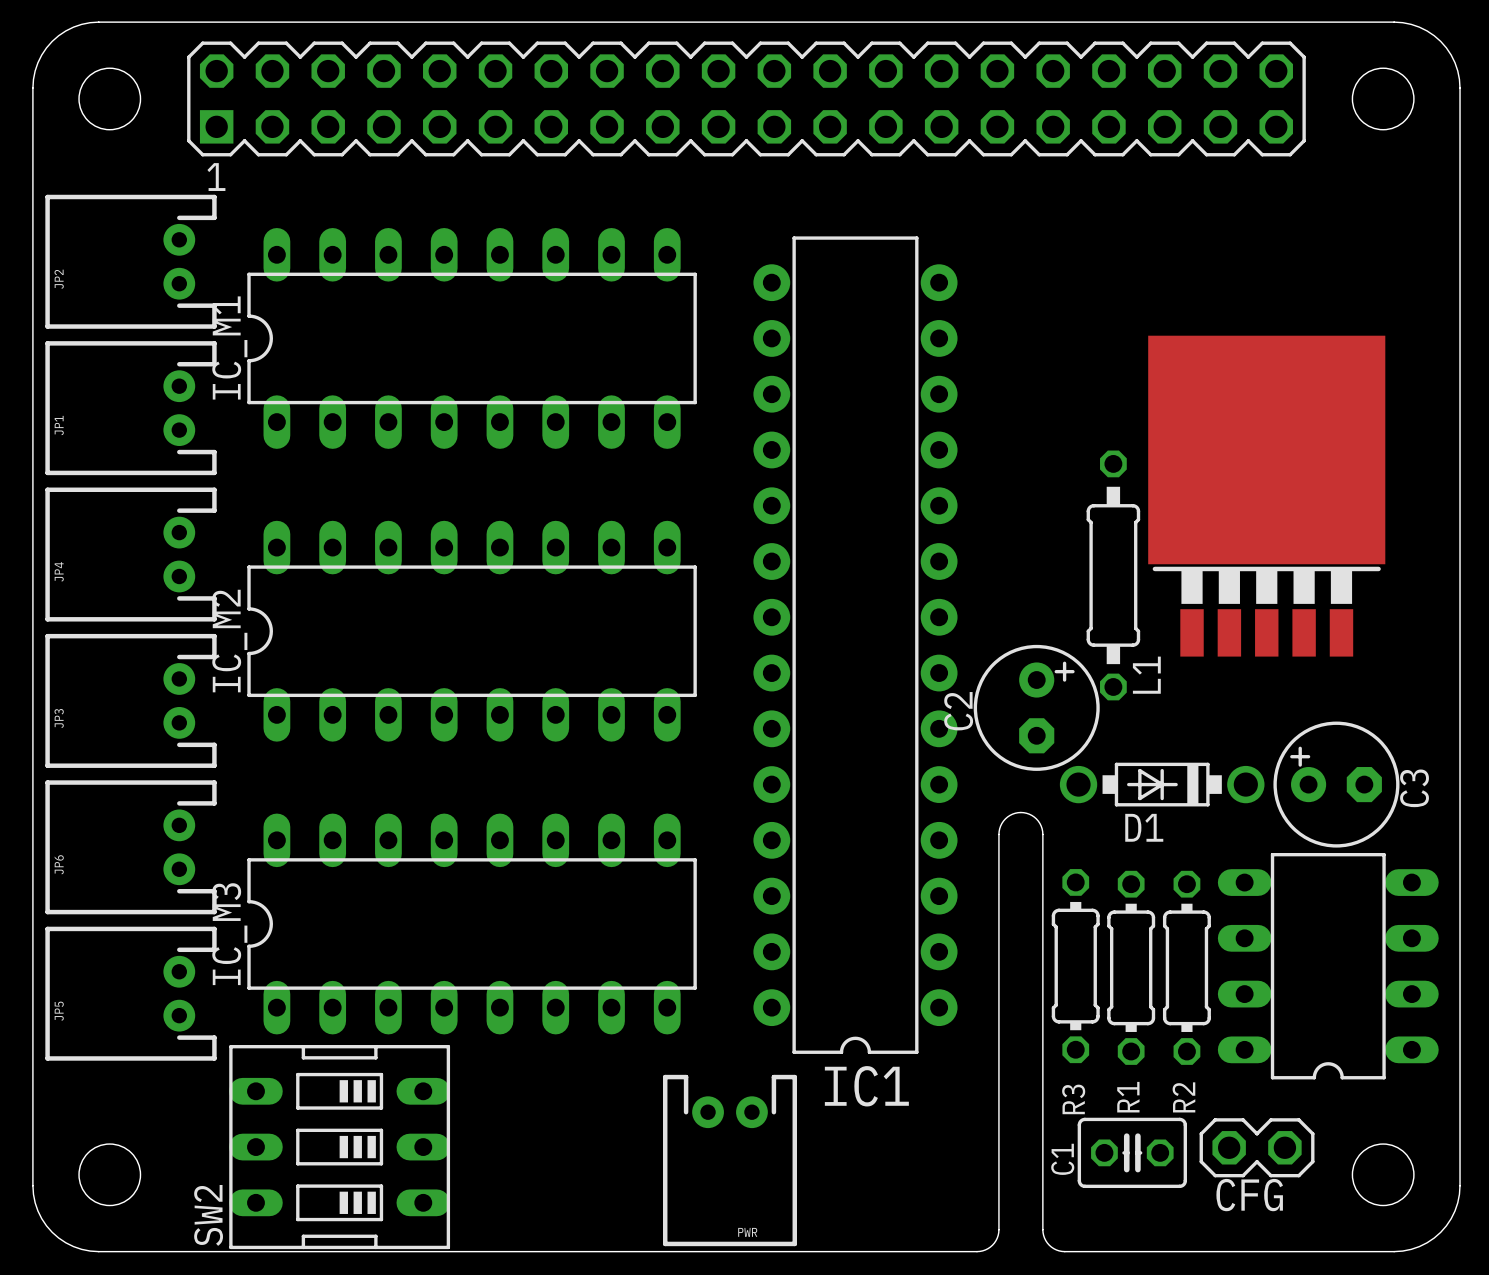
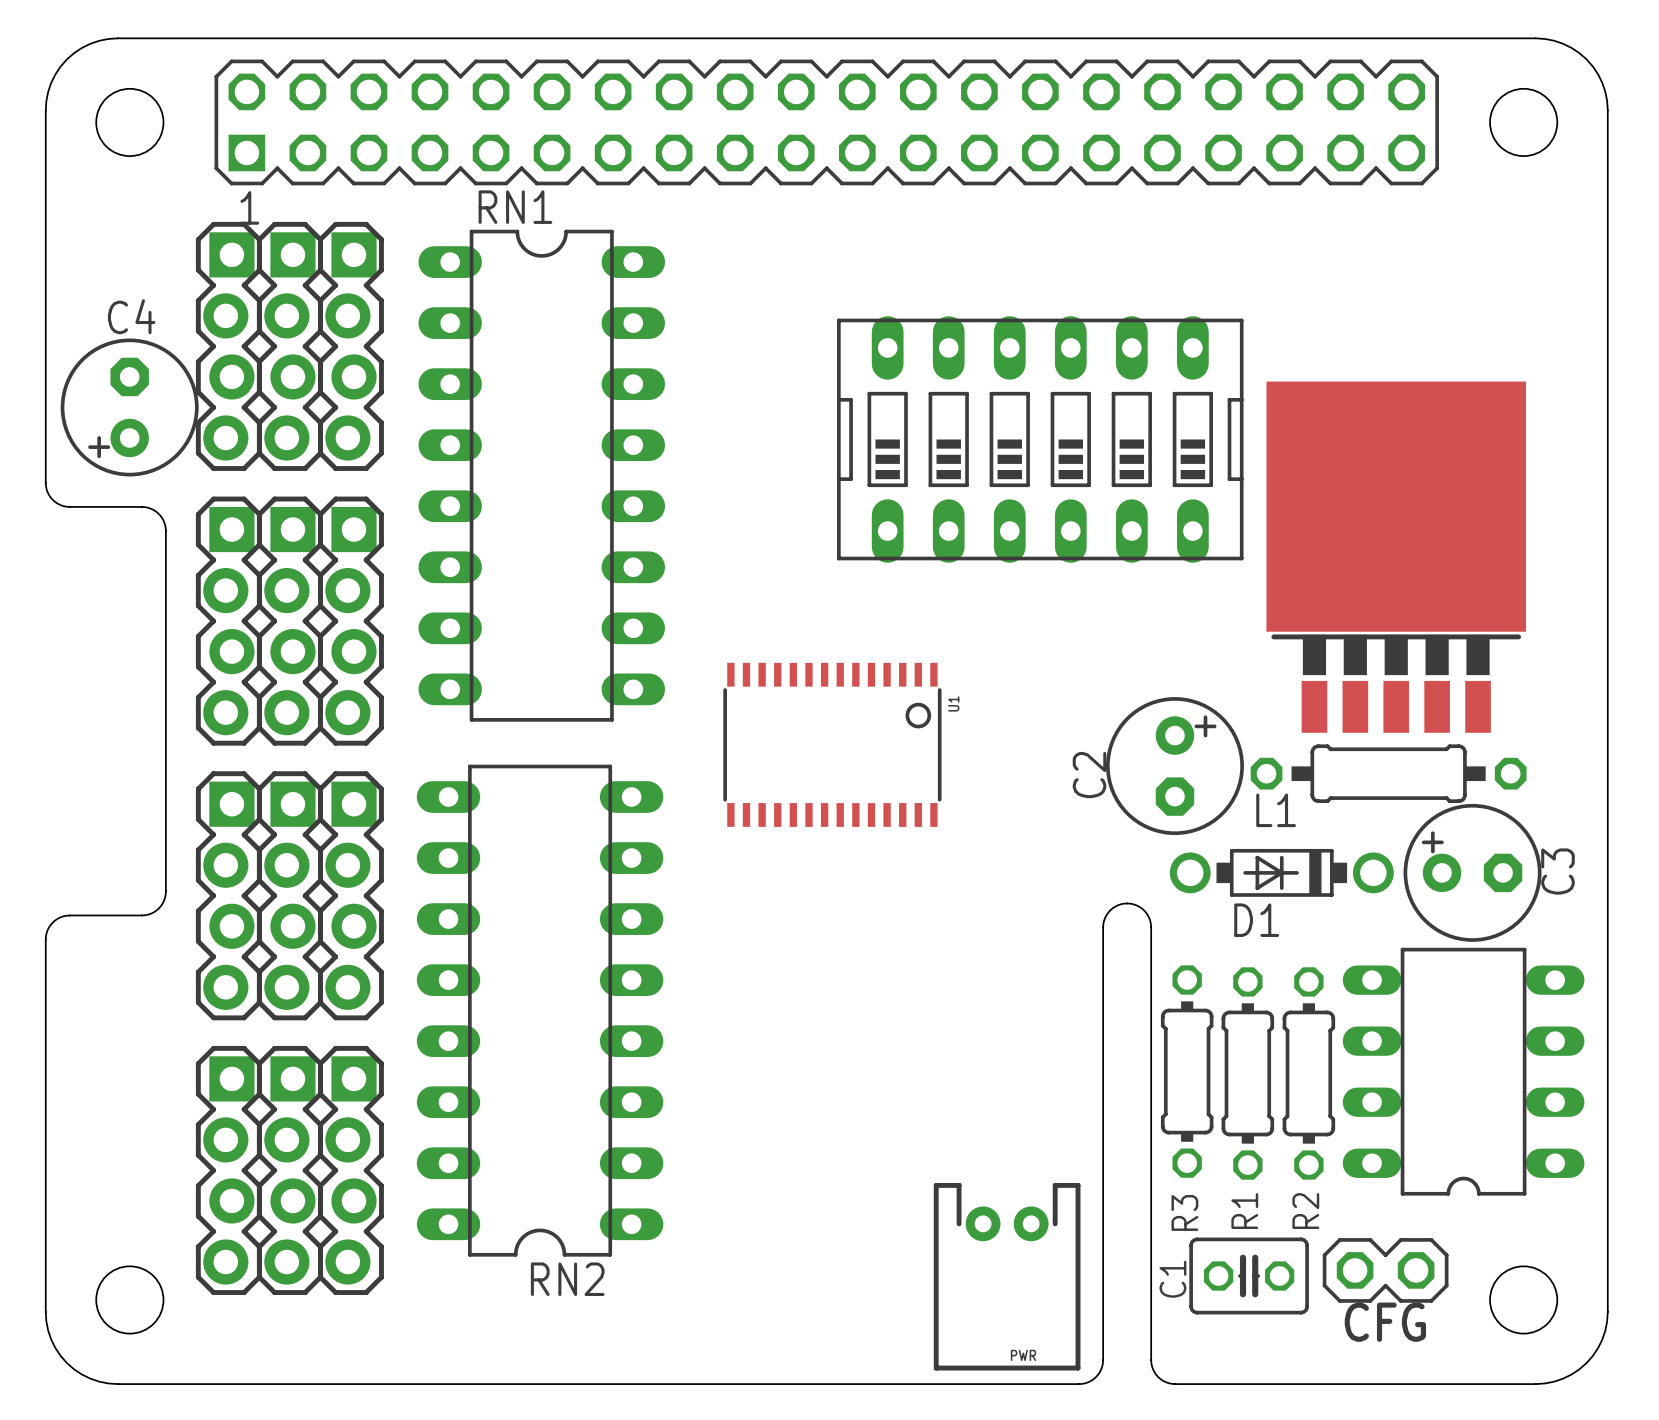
JP2: (131, 261) -> none
part: none -> (228, 346)
part: none -> (289, 346)
part: none -> (350, 346)
IC_M1: (472, 338) -> none
C4: none -> (129, 407)
part: none -> (1040, 439)
JP1: (131, 408) -> none
RN1: none -> (541, 475)
board edge: (32, 428) (32, 845) -> (45, 482) (50, 497) (60, 505) (69, 506) (148, 507) (160, 516) (165, 530) (165, 897) (156, 910) (145, 915) (69, 915) (60, 917) (50, 924) (45, 939)
L1 footprint: [1086, 450, 1141, 701] -> [1250, 744, 1527, 804]
JP4: (131, 554) -> none
part: none -> (228, 621)
part: none -> (289, 621)
part: none -> (350, 621)
IC_M2: (472, 631) -> none
IC1: (855, 645) -> none
U1: none -> (832, 744)
L1 name position: L1 (1146, 675) -> L1 (1276, 810)
JP3: (131, 700) -> none
C2 position: (1036, 707) -> (1174, 766)
part: none -> (228, 895)
part: none -> (289, 895)
part: none -> (350, 895)
JP6: (131, 847) -> none
RN2: none -> (540, 1010)
IC_M3: (472, 923) -> none
JP5: (131, 993) -> none
part: none -> (228, 1170)
part: none -> (289, 1170)
part: none -> (350, 1170)
SW2: (339, 1147) -> none
PWR position: (730, 1160) -> (1007, 1276)

